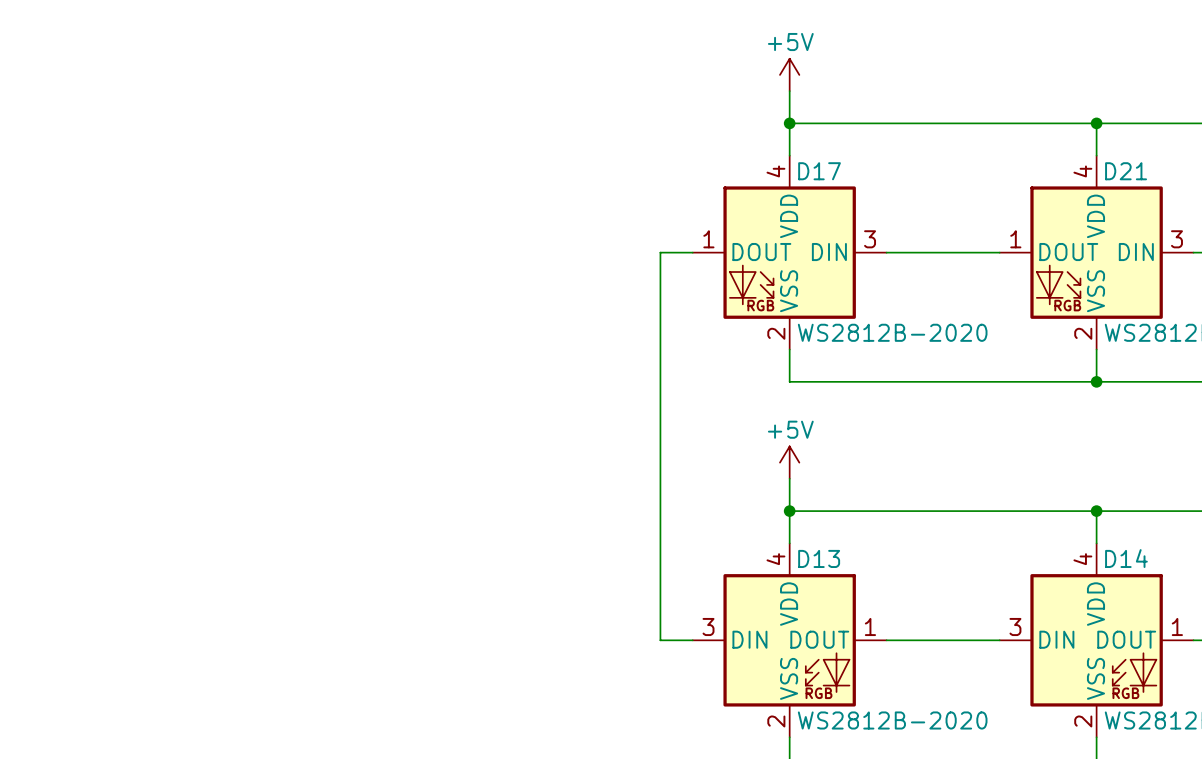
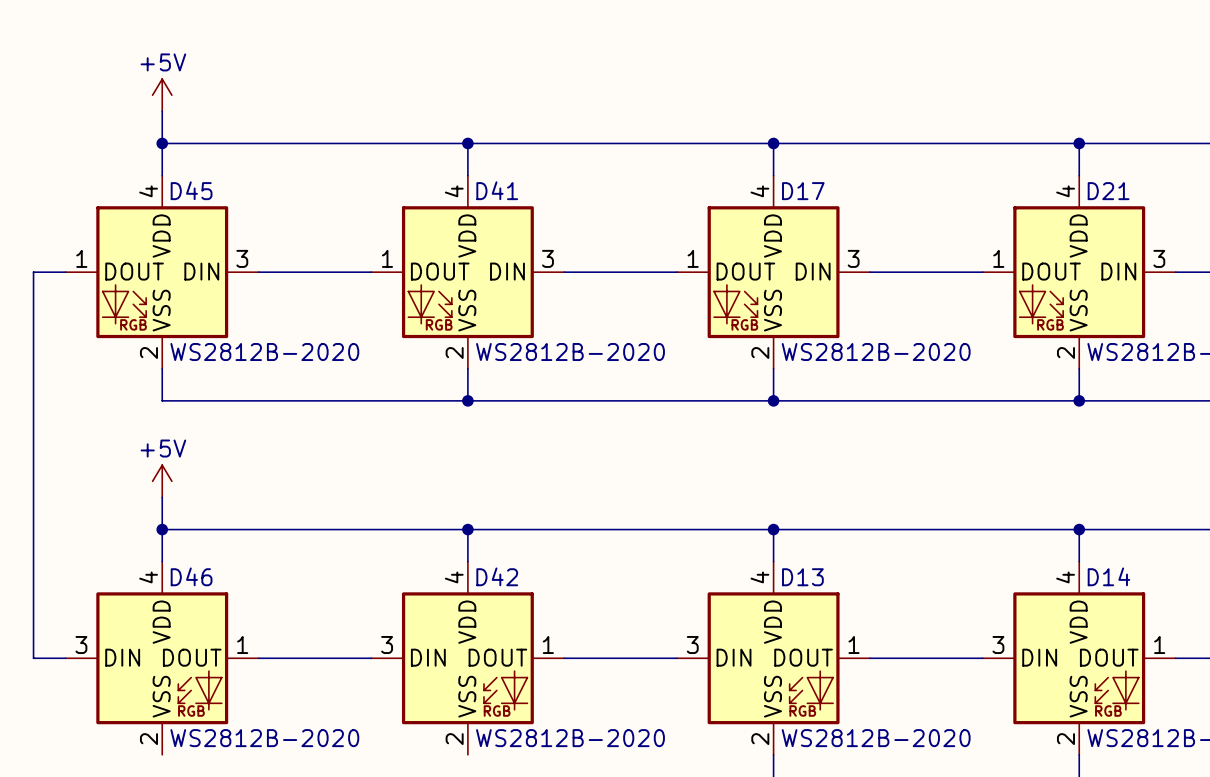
power symbol: none -> +5V (162, 95)
power symbol: +5V (789, 74) -> none
wire: none -> (162, 111) (162, 175)
wire: (789, 91) (789, 123) -> (162, 143) (773, 143)
junction: none -> (162, 143)
wire: none -> (467, 143) (467, 175)
junction: none -> (467, 143)
wire: none -> (65, 272) (33, 272) (33, 658) (65, 658)
D45: none -> WS2812B-2020 (162, 272)
wire: none -> (258, 272) (371, 272)
D41: none -> WS2812B-2020 (467, 272)
wire: (660, 252) (660, 640) -> (644, 272) (564, 272)
wire: none -> (162, 368) (162, 400) (773, 400)
wire: none -> (467, 368) (467, 400)
junction: none -> (467, 400)
junction: none -> (773, 400)
power symbol: none -> +5V (162, 481)
power symbol: +5V (789, 462) -> none
wire: none -> (162, 497) (162, 561)
wire: (789, 478) (789, 511) -> (162, 529) (773, 529)
junction: none -> (162, 529)
wire: none -> (467, 529) (467, 561)
junction: none -> (467, 529)
D46: none -> WS2812B-2020 (162, 658)
wire: none -> (258, 658) (371, 658)
D42: none -> WS2812B-2020 (467, 658)
wire: none -> (564, 658) (644, 658)

